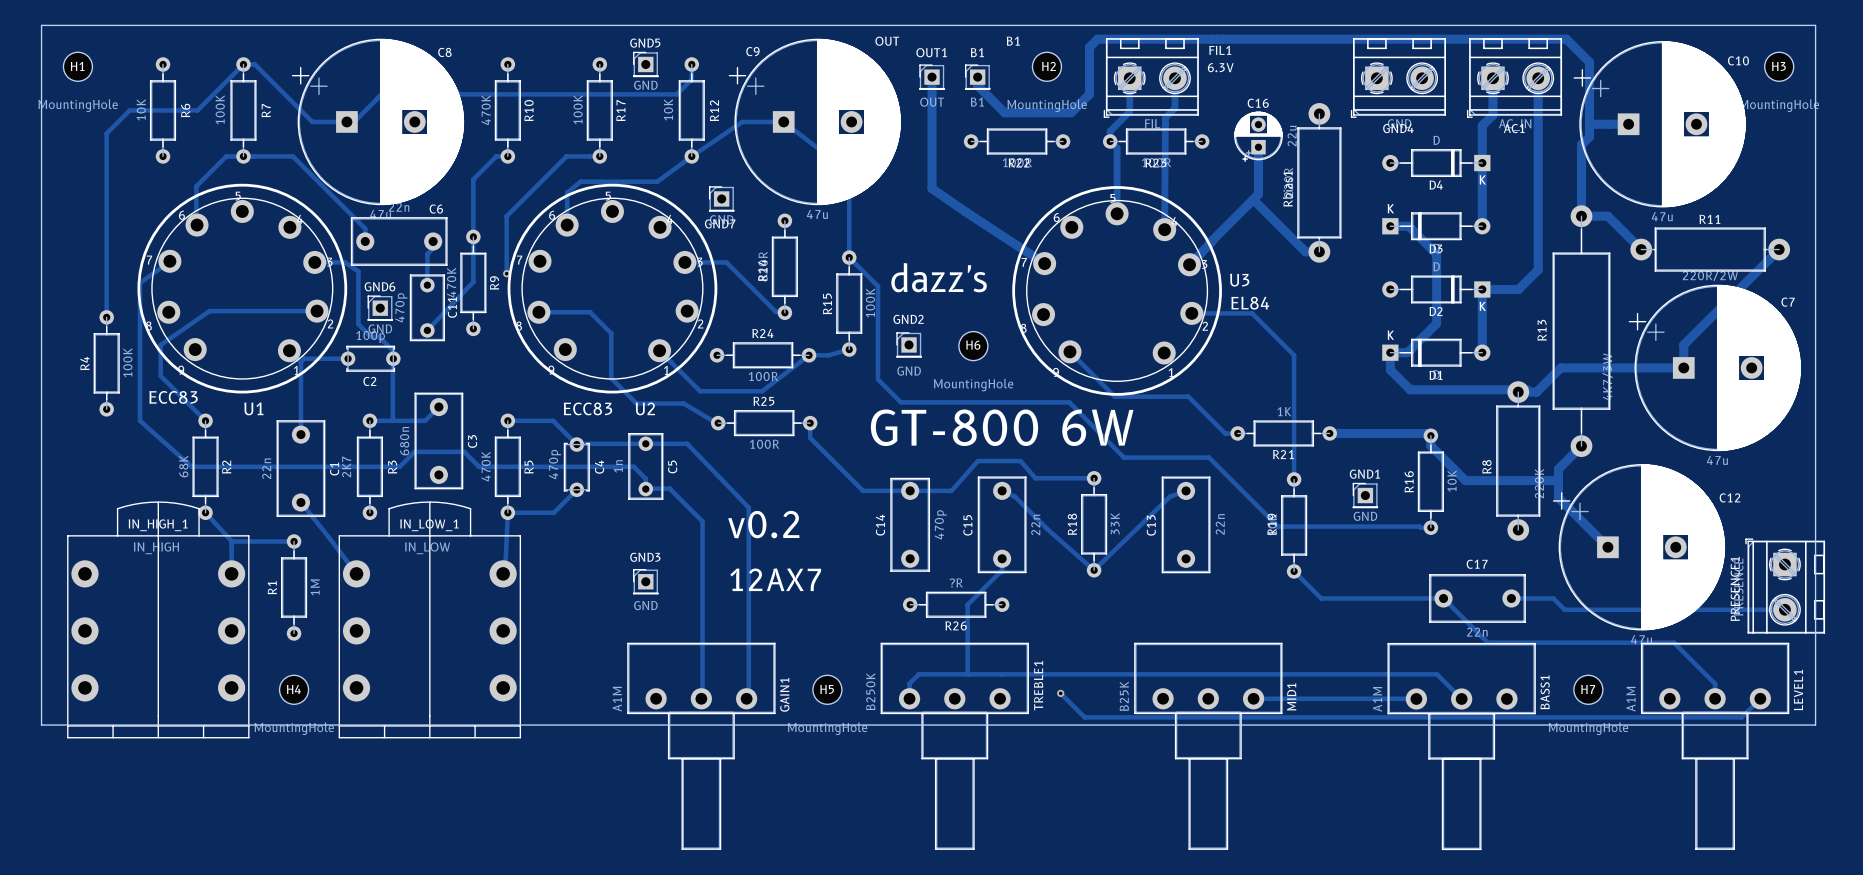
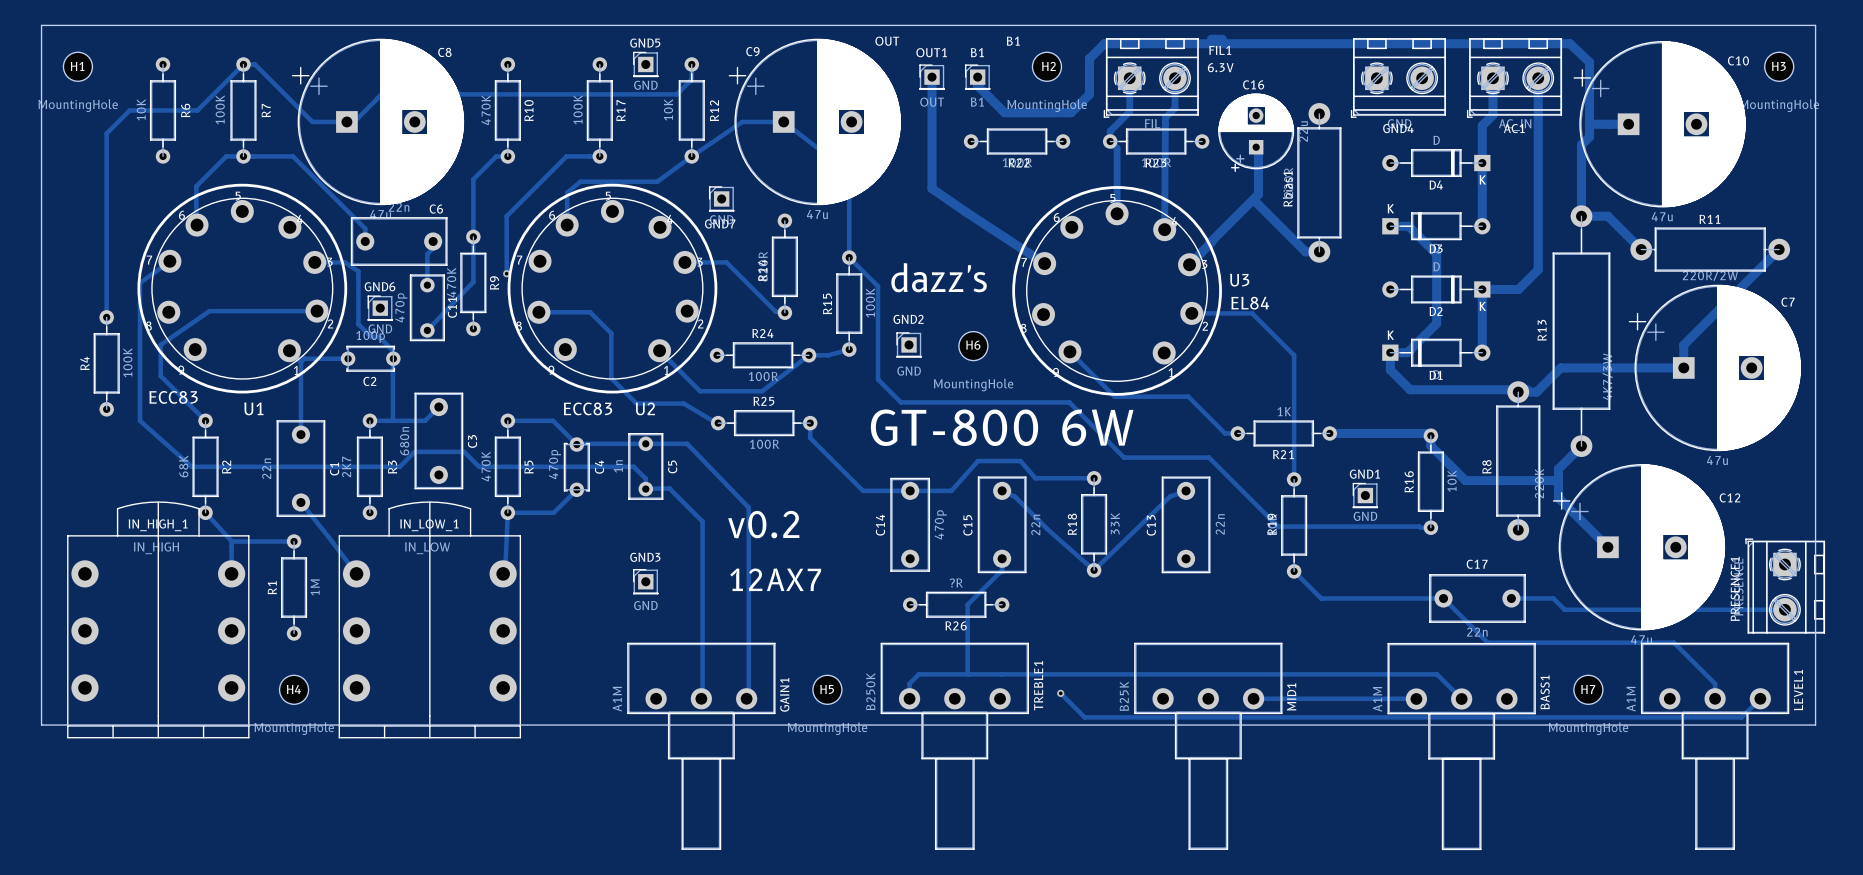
track: (1211, 39) (1097, 39) (1089, 47) (1089, 58) -> none
track: (1222, 39) (1566, 39) (1589, 62) -> (1089, 58) (1104, 43) (1569, 43) (1589, 62)
C16 footprint: [1234, 111, 1283, 162] -> [1218, 93, 1295, 172]

